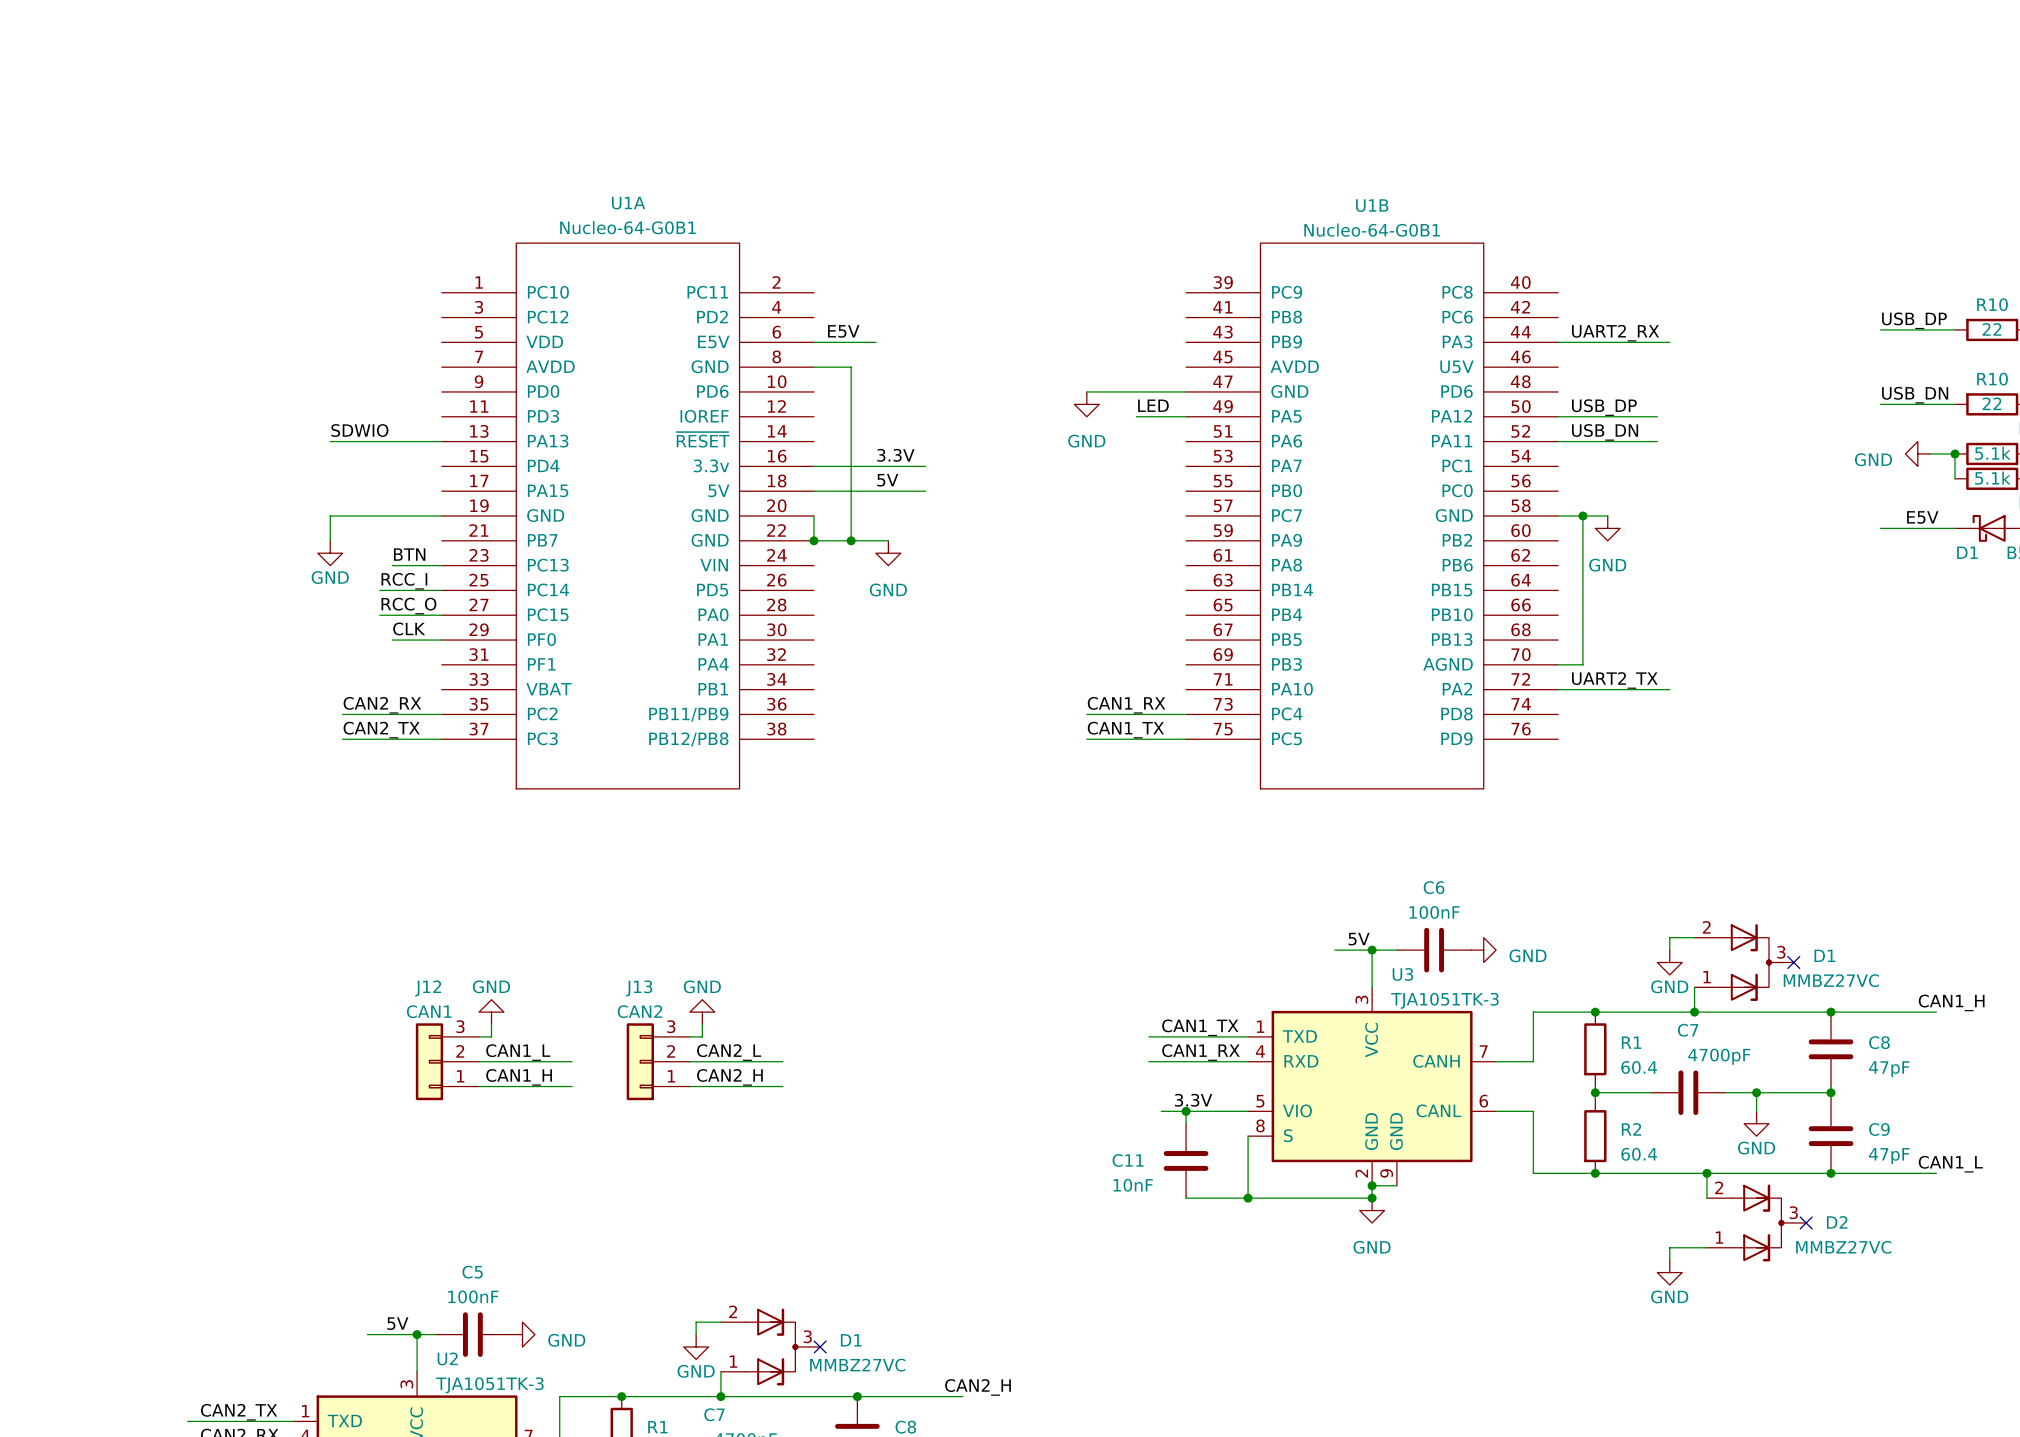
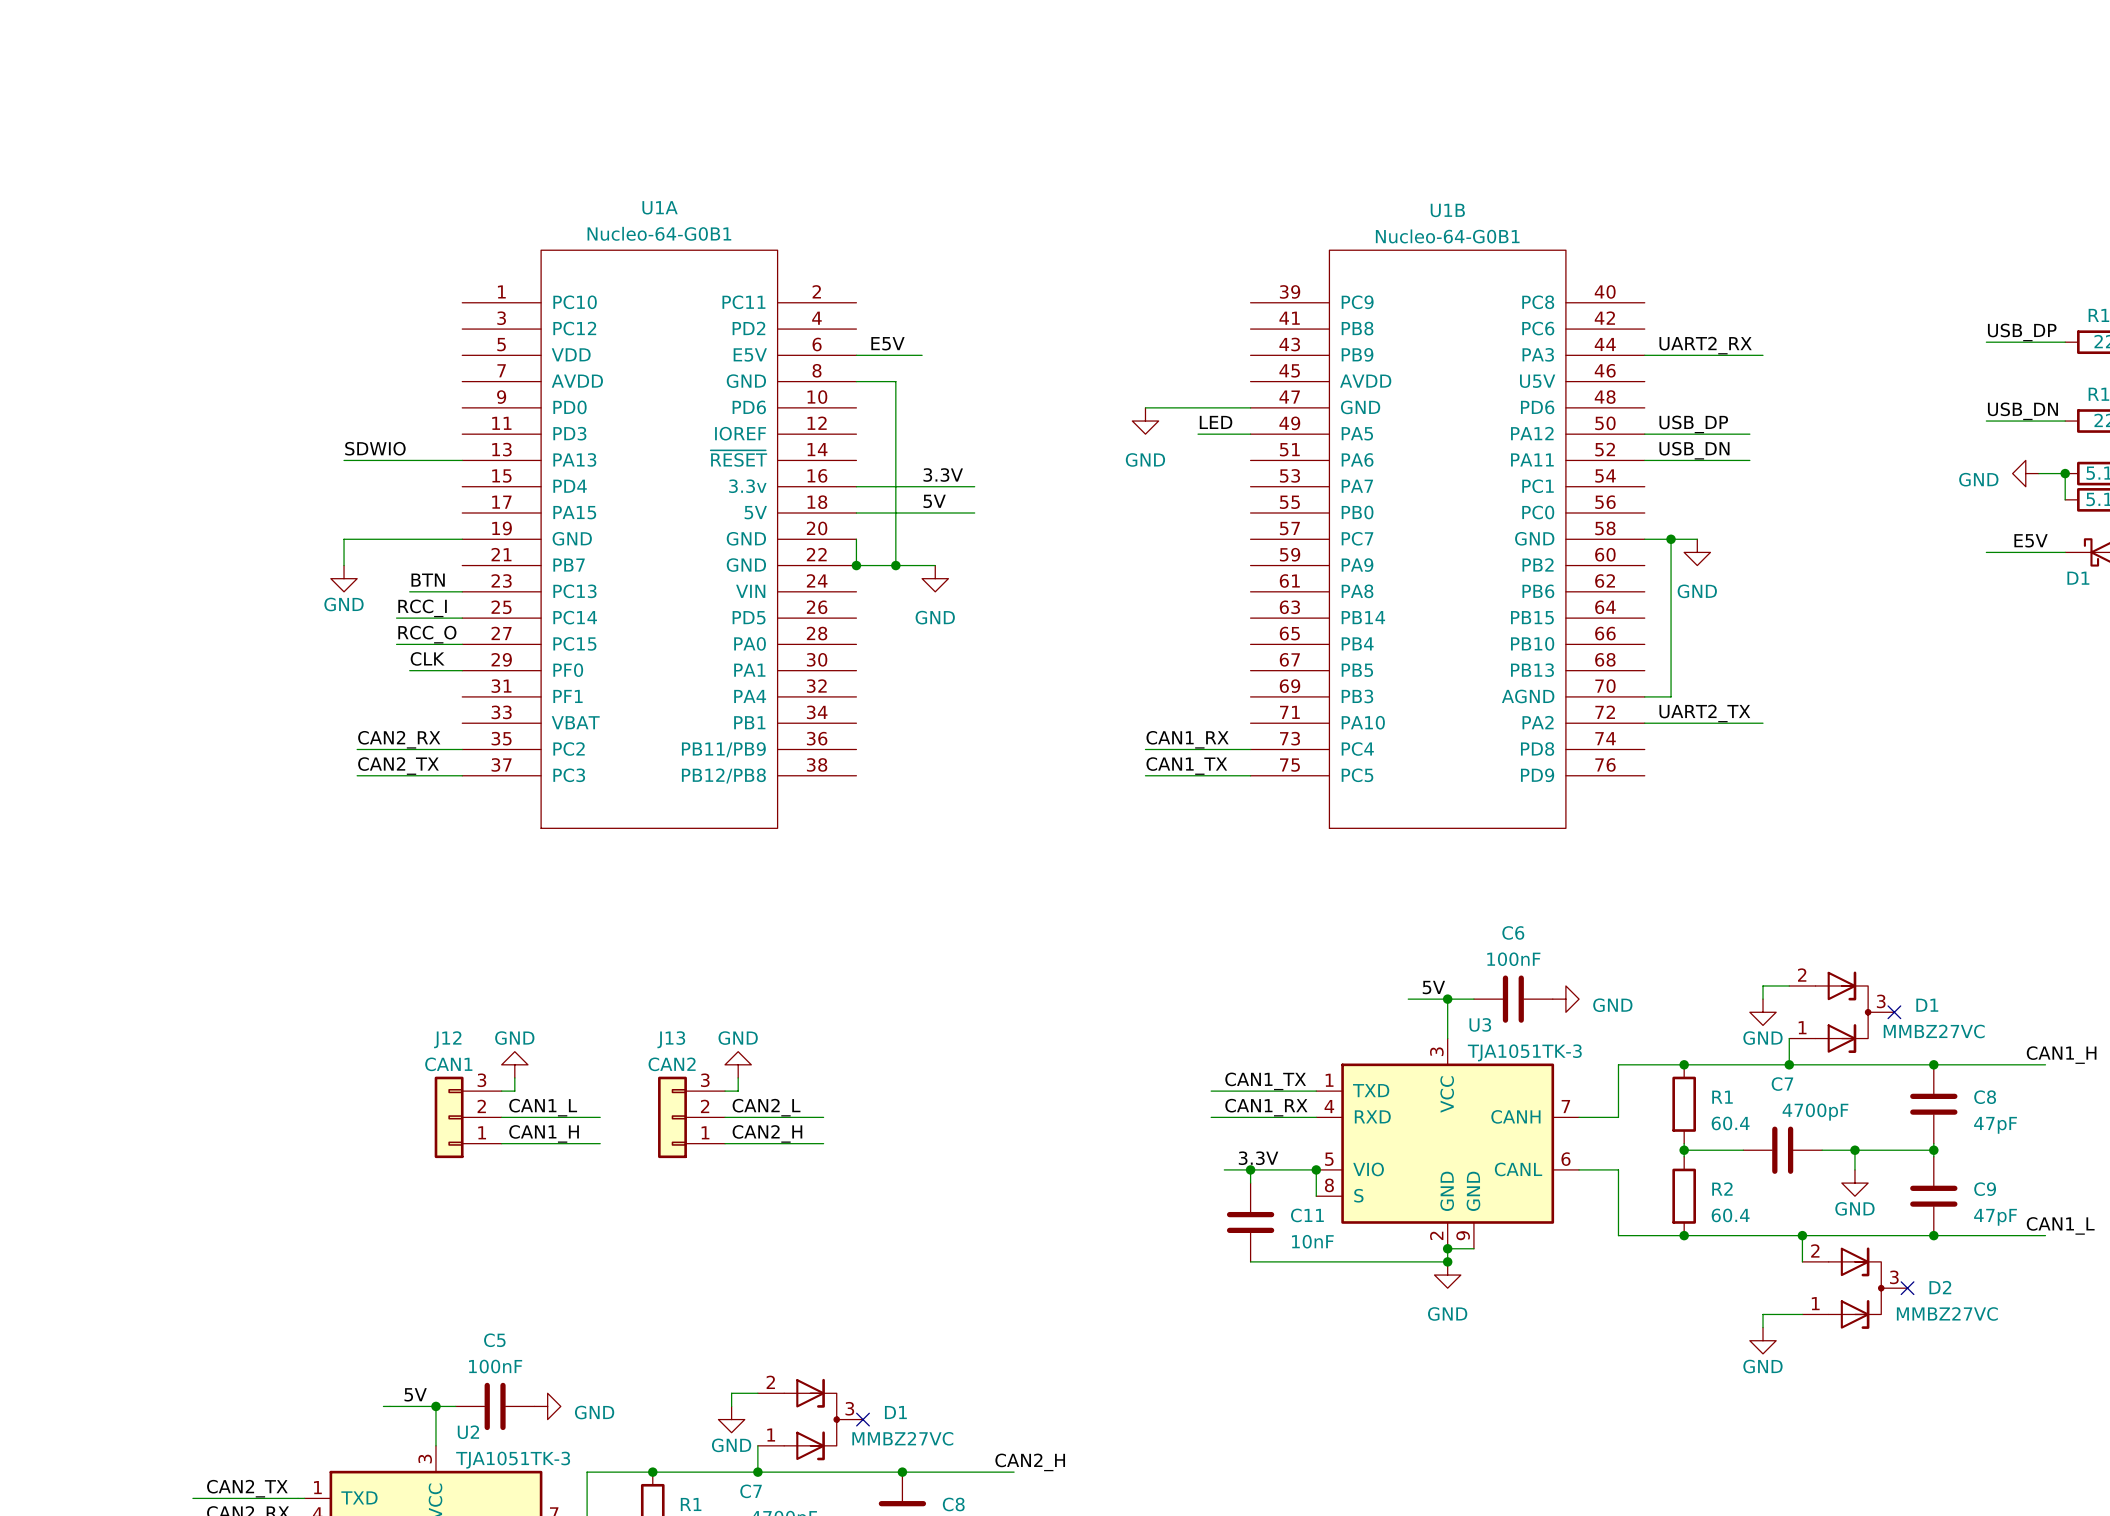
junction: none -> (1316, 1169)
wire: (1248, 1136) (1248, 1198) -> (1316, 1196) (1316, 1169)
C11 name position: C11 (1128, 1160) -> C11 (1307, 1215)
C11 value position: 10nF (1133, 1185) -> 10nF (1312, 1241)
junction: (1248, 1198) -> none

